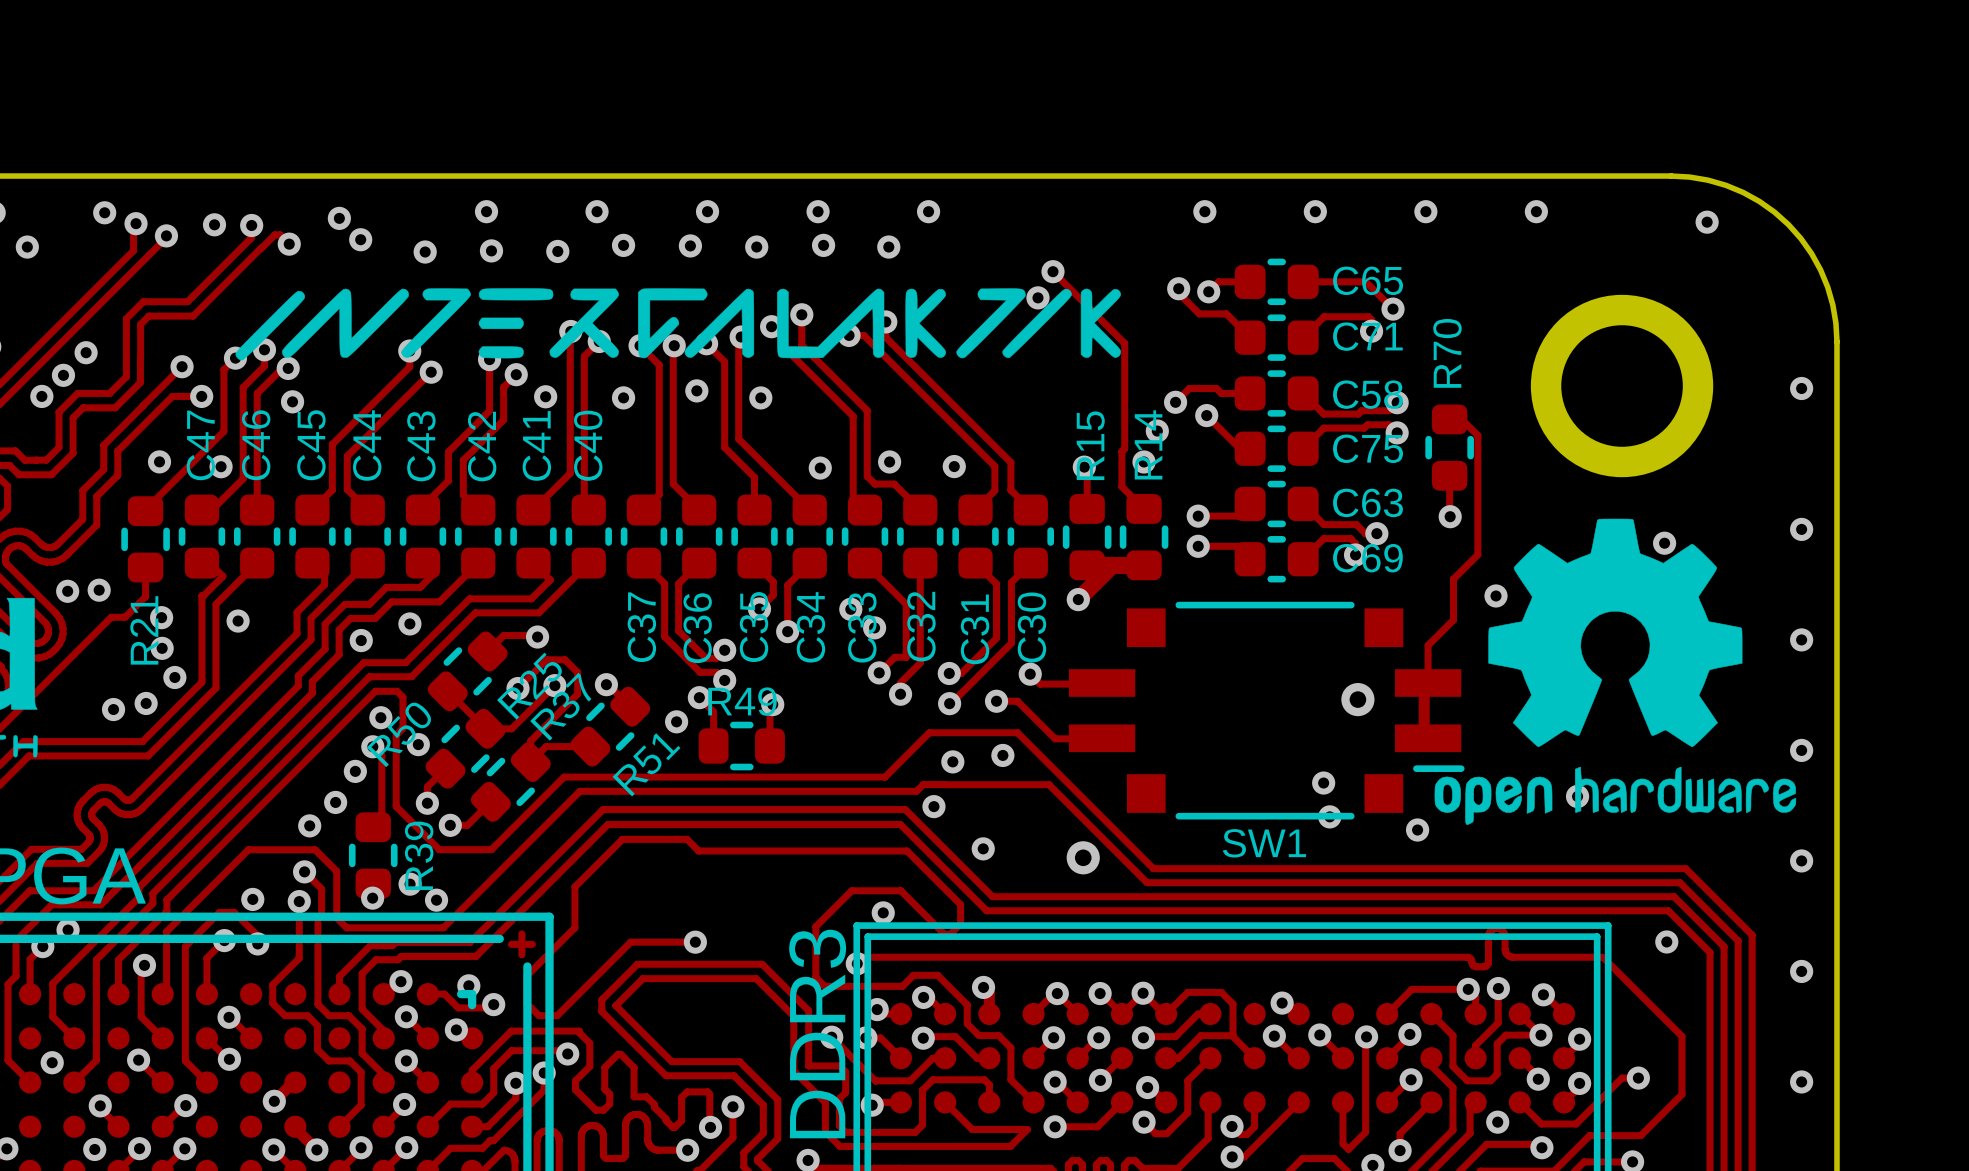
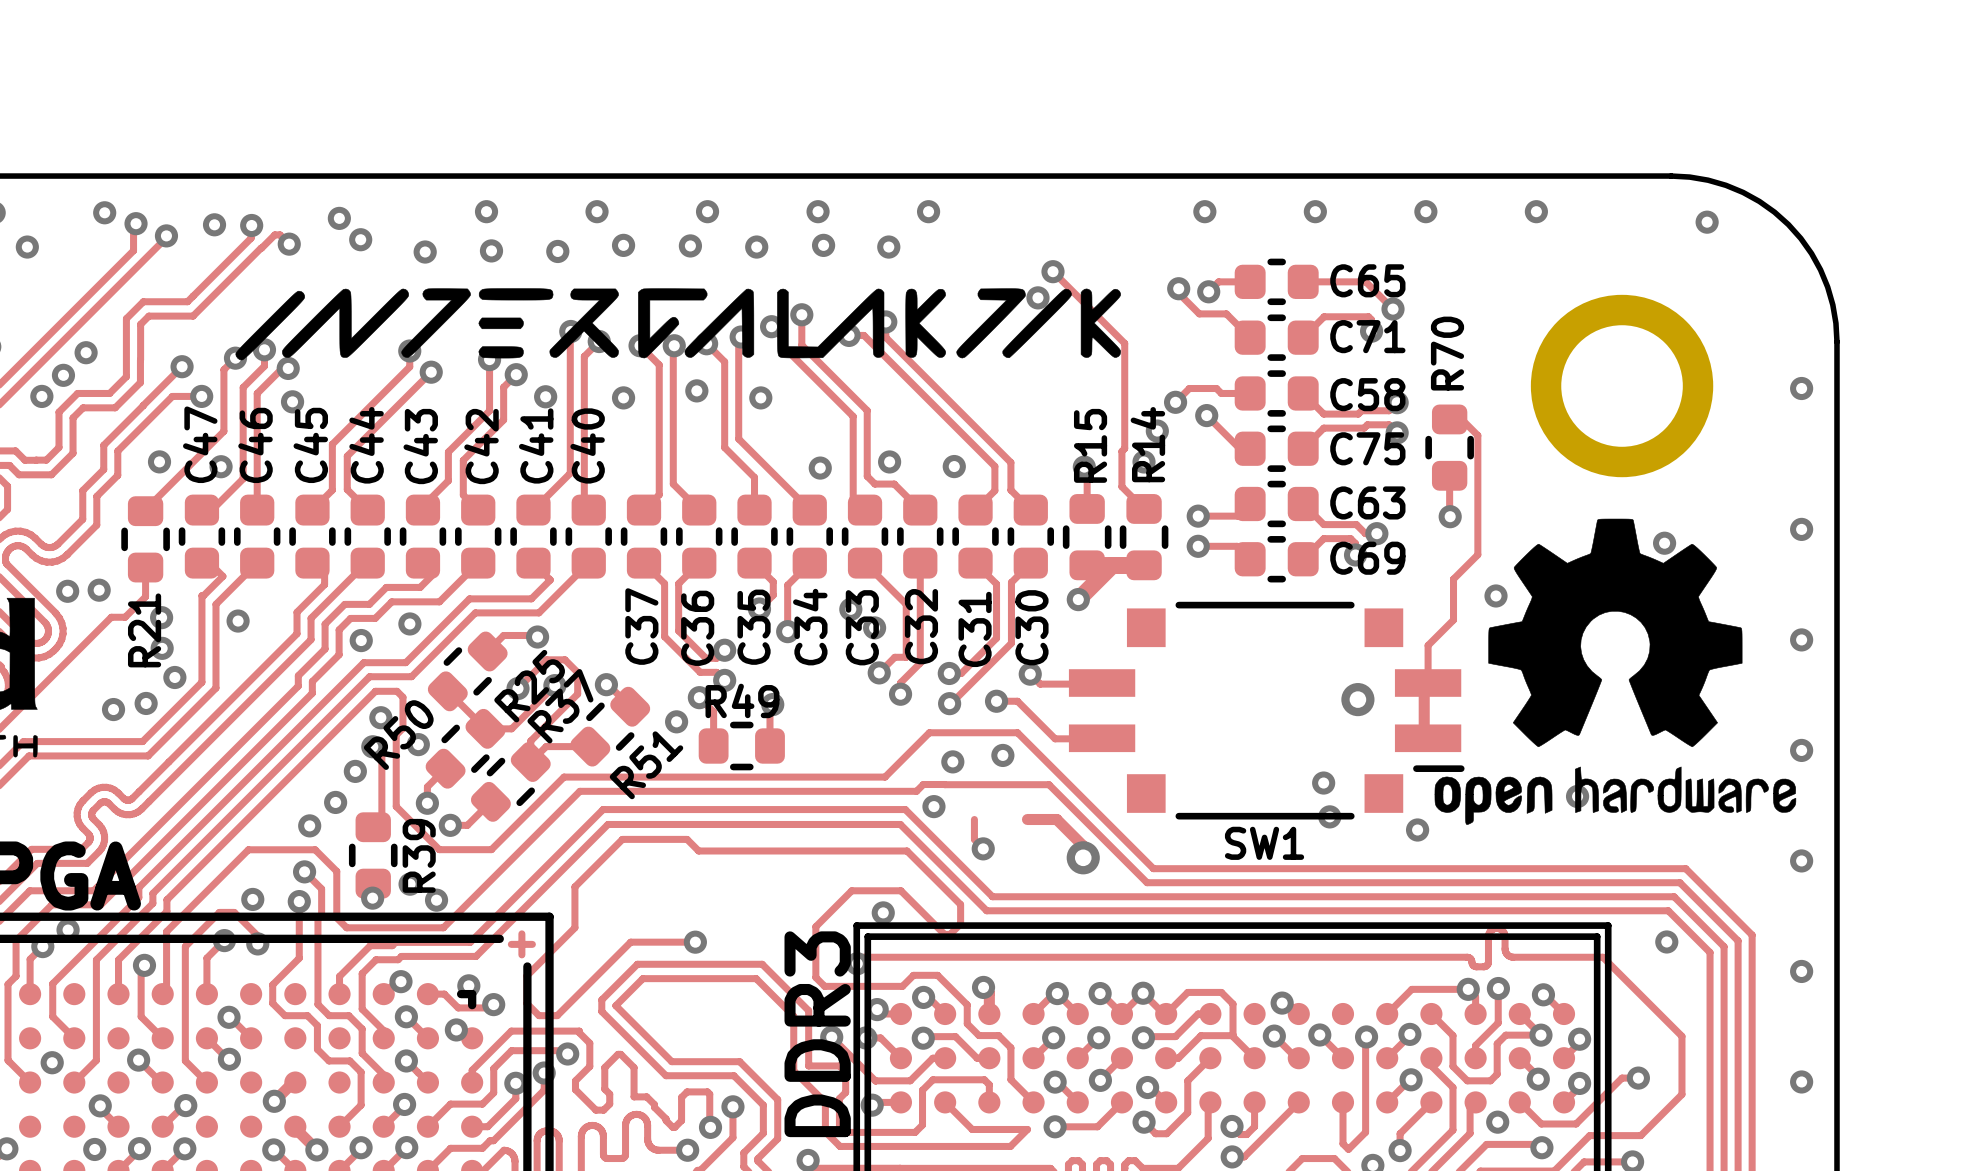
track: none -> (974, 819) (974, 839) (983, 848)
track: none -> (1027, 819) (1056, 819) (1083, 845) (1083, 857)

